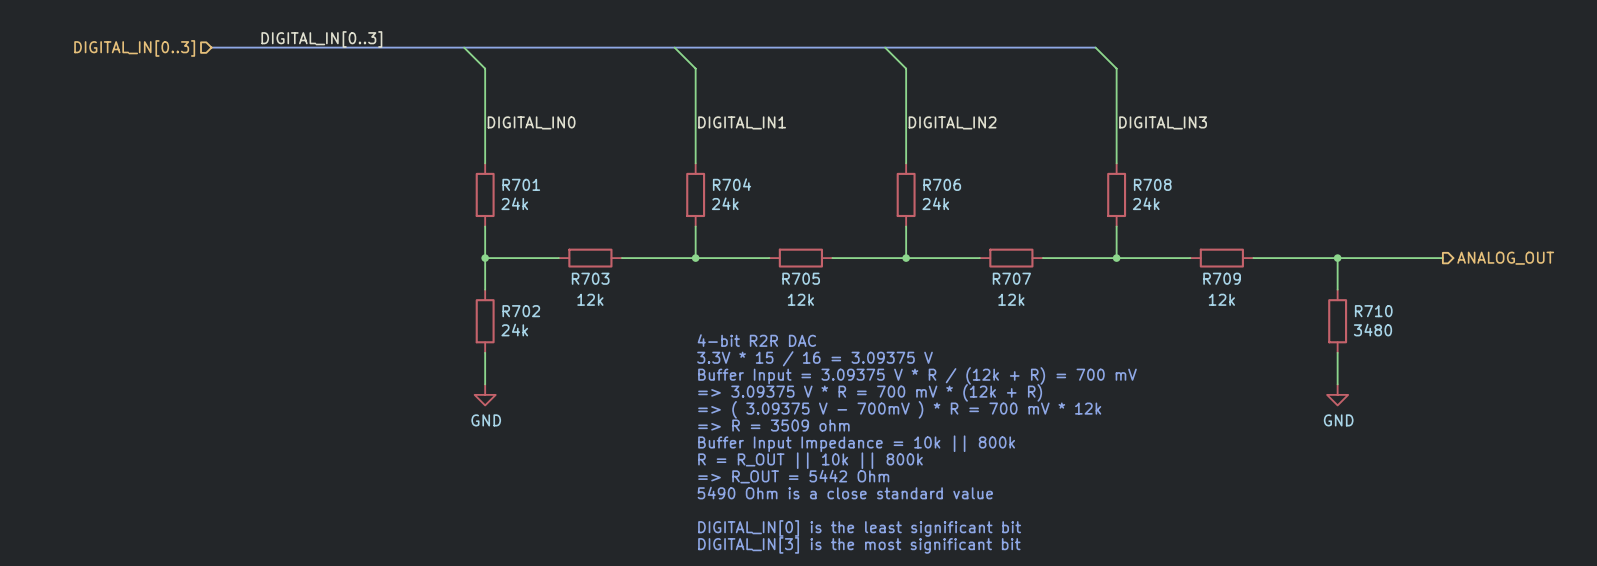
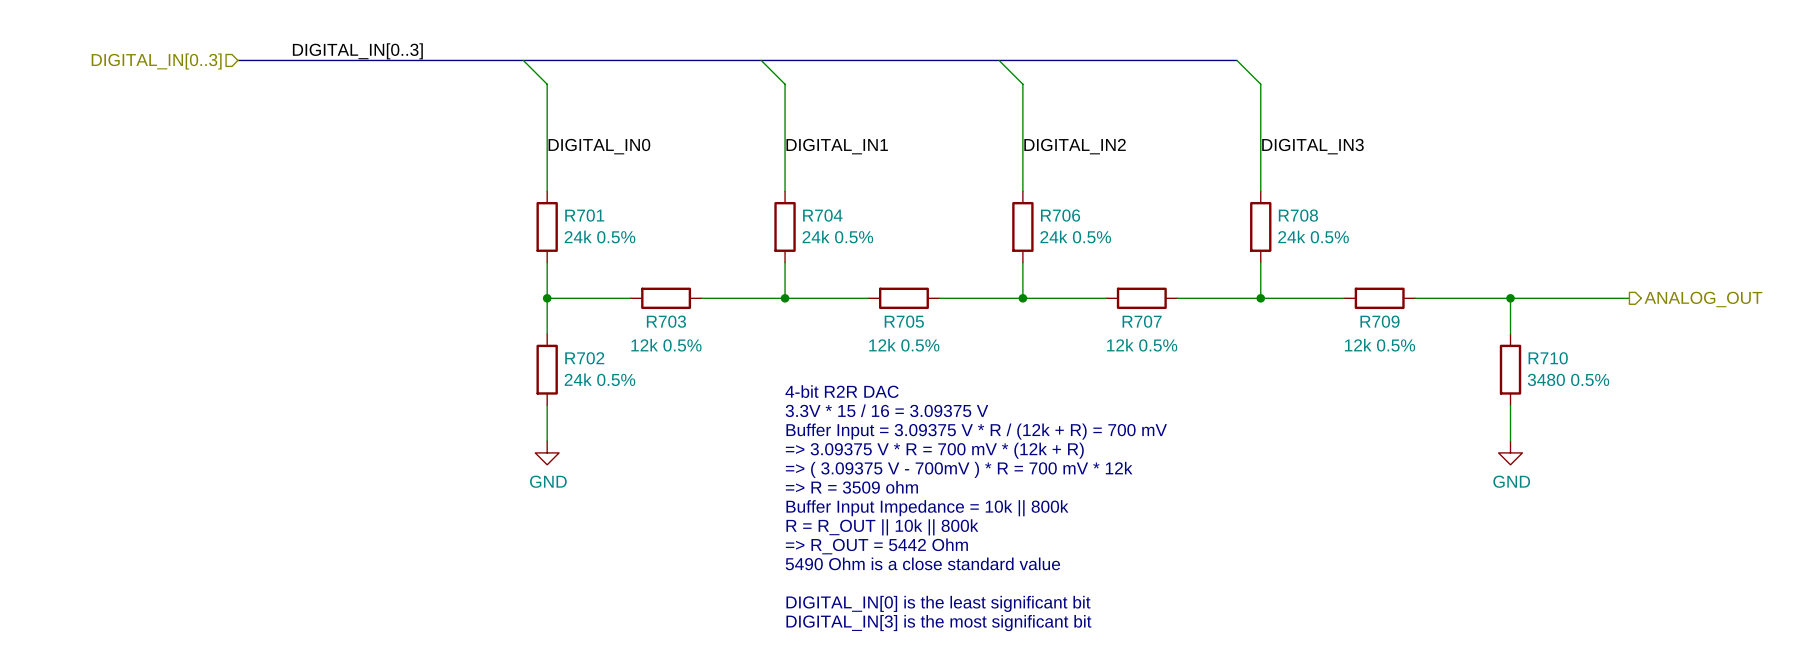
R701 value: 24k (514, 203) -> 24k 0.5% (599, 236)
R704 value: 24k (725, 203) -> 24k 0.5% (837, 236)
R706 value: 24k (935, 203) -> 24k 0.5% (1075, 236)
R708 value: 24k (1146, 203) -> 24k 0.5% (1313, 236)
R703 value: 12k (590, 299) -> 12k 0.5% (666, 345)
R705 value: 12k (800, 299) -> 12k 0.5% (904, 345)
R707 value: 12k (1011, 299) -> 12k 0.5% (1142, 345)
R709 value: 12k (1221, 299) -> 12k 0.5% (1380, 345)
R702 value: 24k (514, 330) -> 24k 0.5% (599, 379)
R710 value: 3480 (1372, 330) -> 3480 0.5% (1568, 379)

